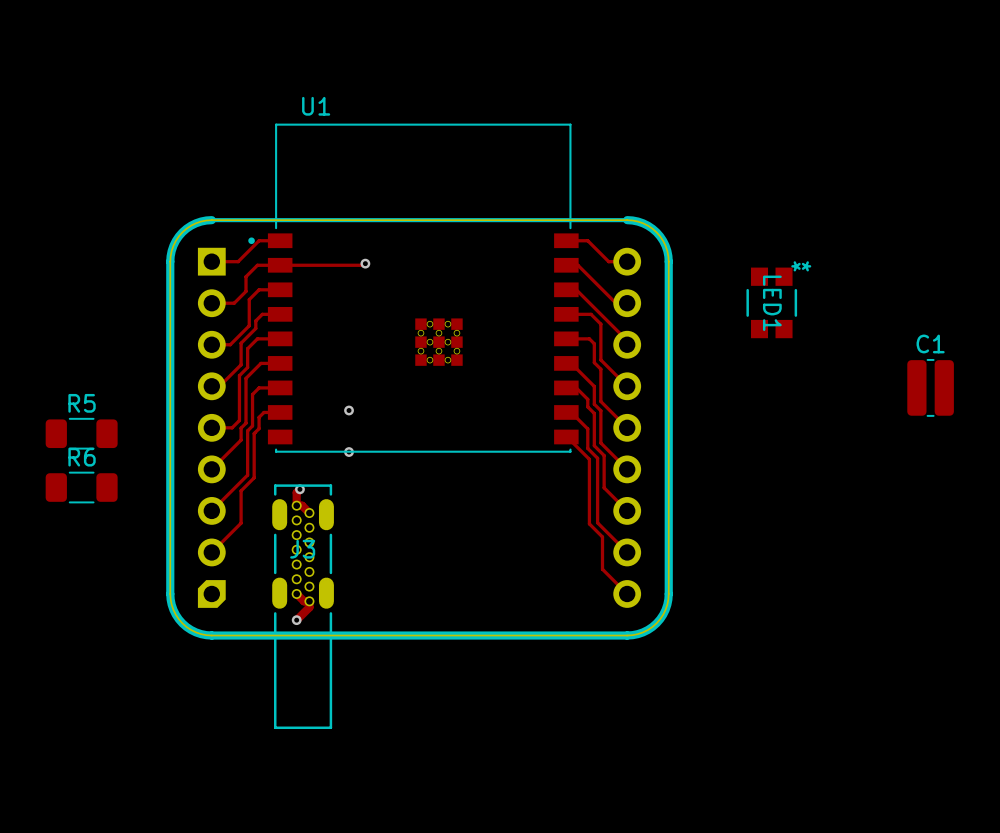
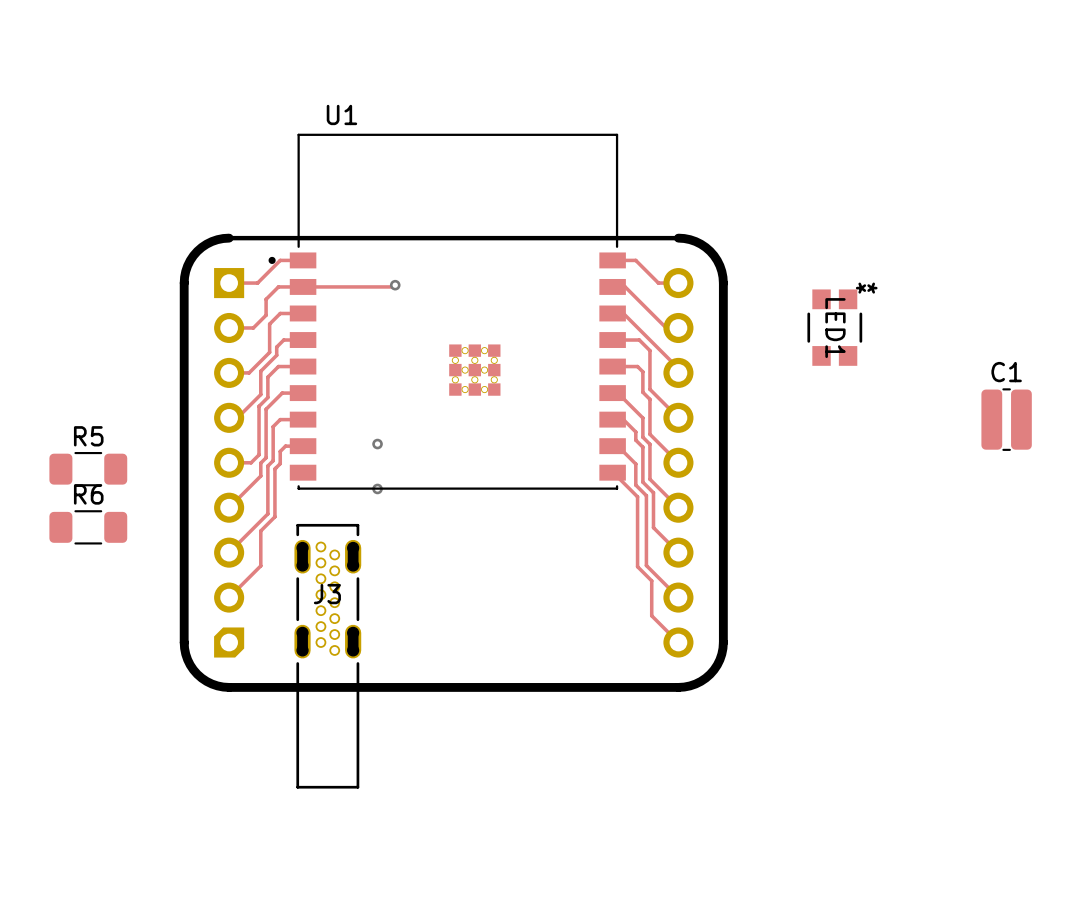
track: (299, 489) (296, 492) (296, 505) (302, 505) (309, 513) -> none
via: (299, 489) -> none
track: (296, 593) (304, 601) (309, 601) (309, 607) (296, 620) -> none
via: (296, 620) -> none

